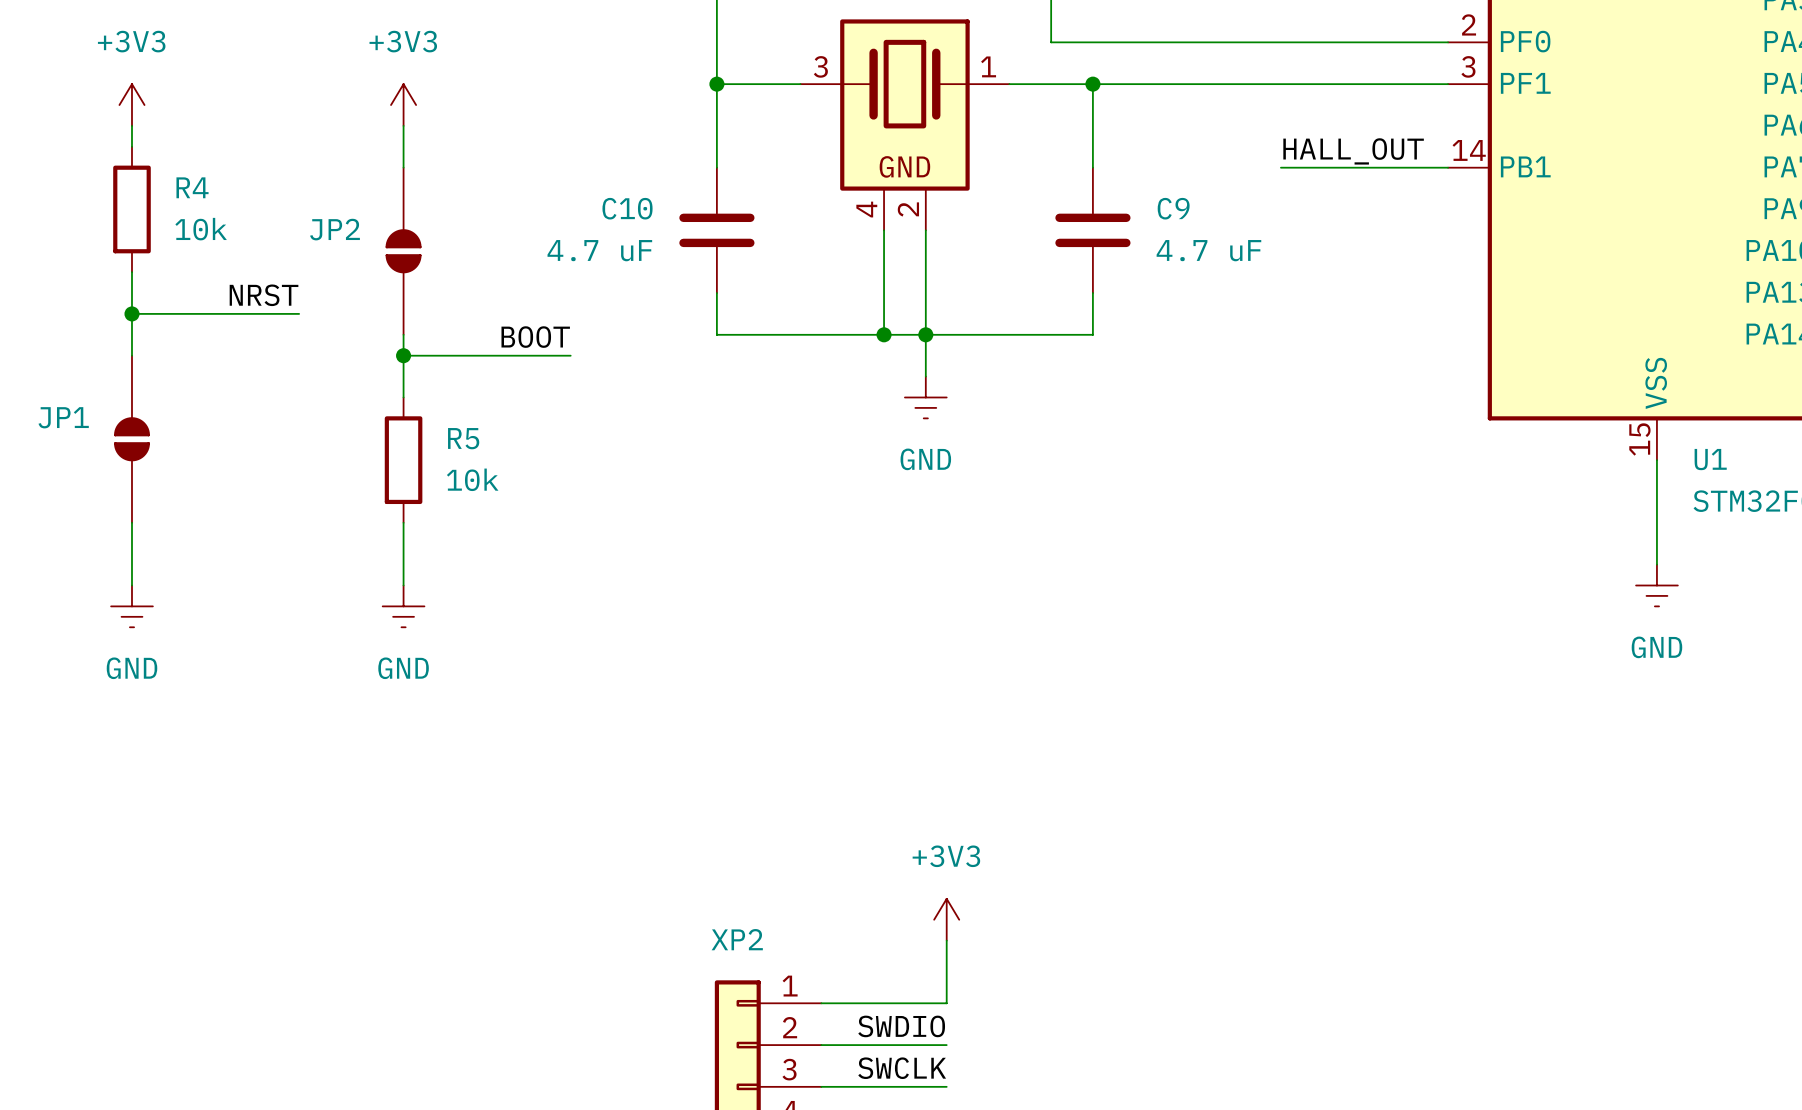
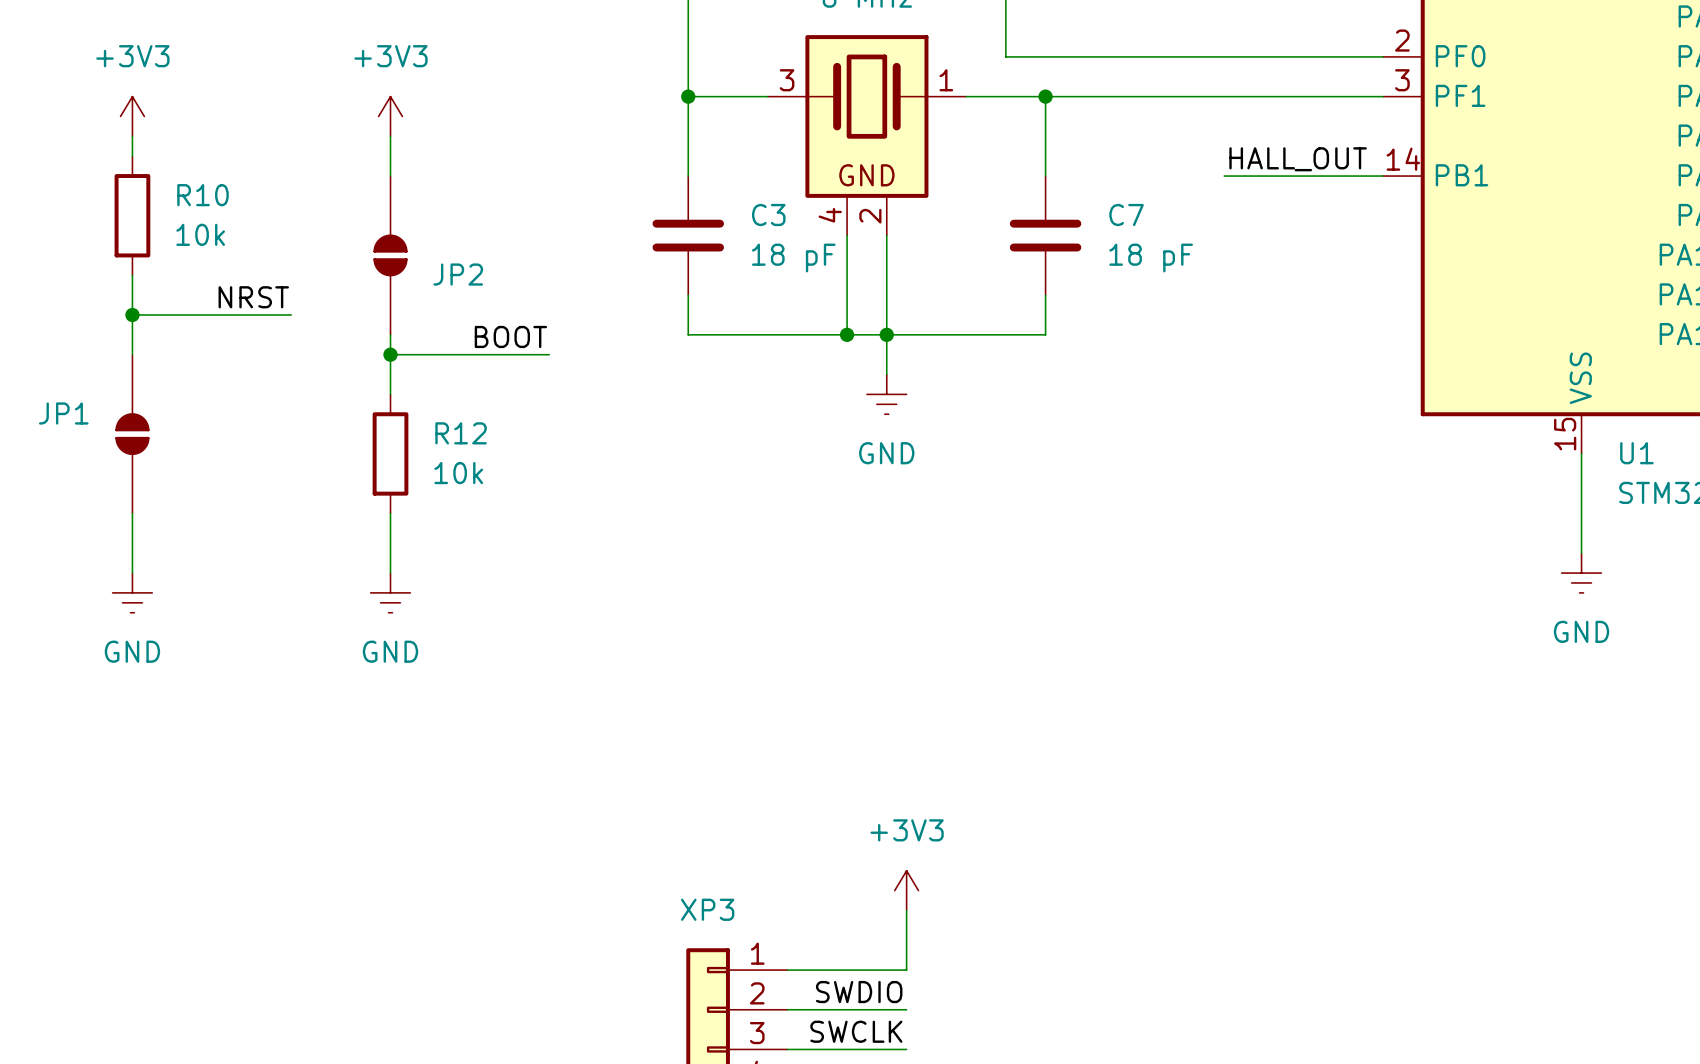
R4 name: R4 (192, 187) -> R10 (203, 195)
C10 name: C10 (627, 208) -> C3 (768, 214)
C9 name: C9 (1173, 208) -> C7 (1126, 214)
JP2 name position: JP2 (335, 229) -> JP2 (458, 274)
C10 value: 4.7 uF (599, 250) -> 18 pF (793, 258)
C9 value: 4.7 uF (1208, 250) -> 18 pF (1151, 258)
R5 name: R5 (463, 438) -> R12 (461, 433)
XP2 name: XP2 (737, 939) -> XP3 (707, 909)

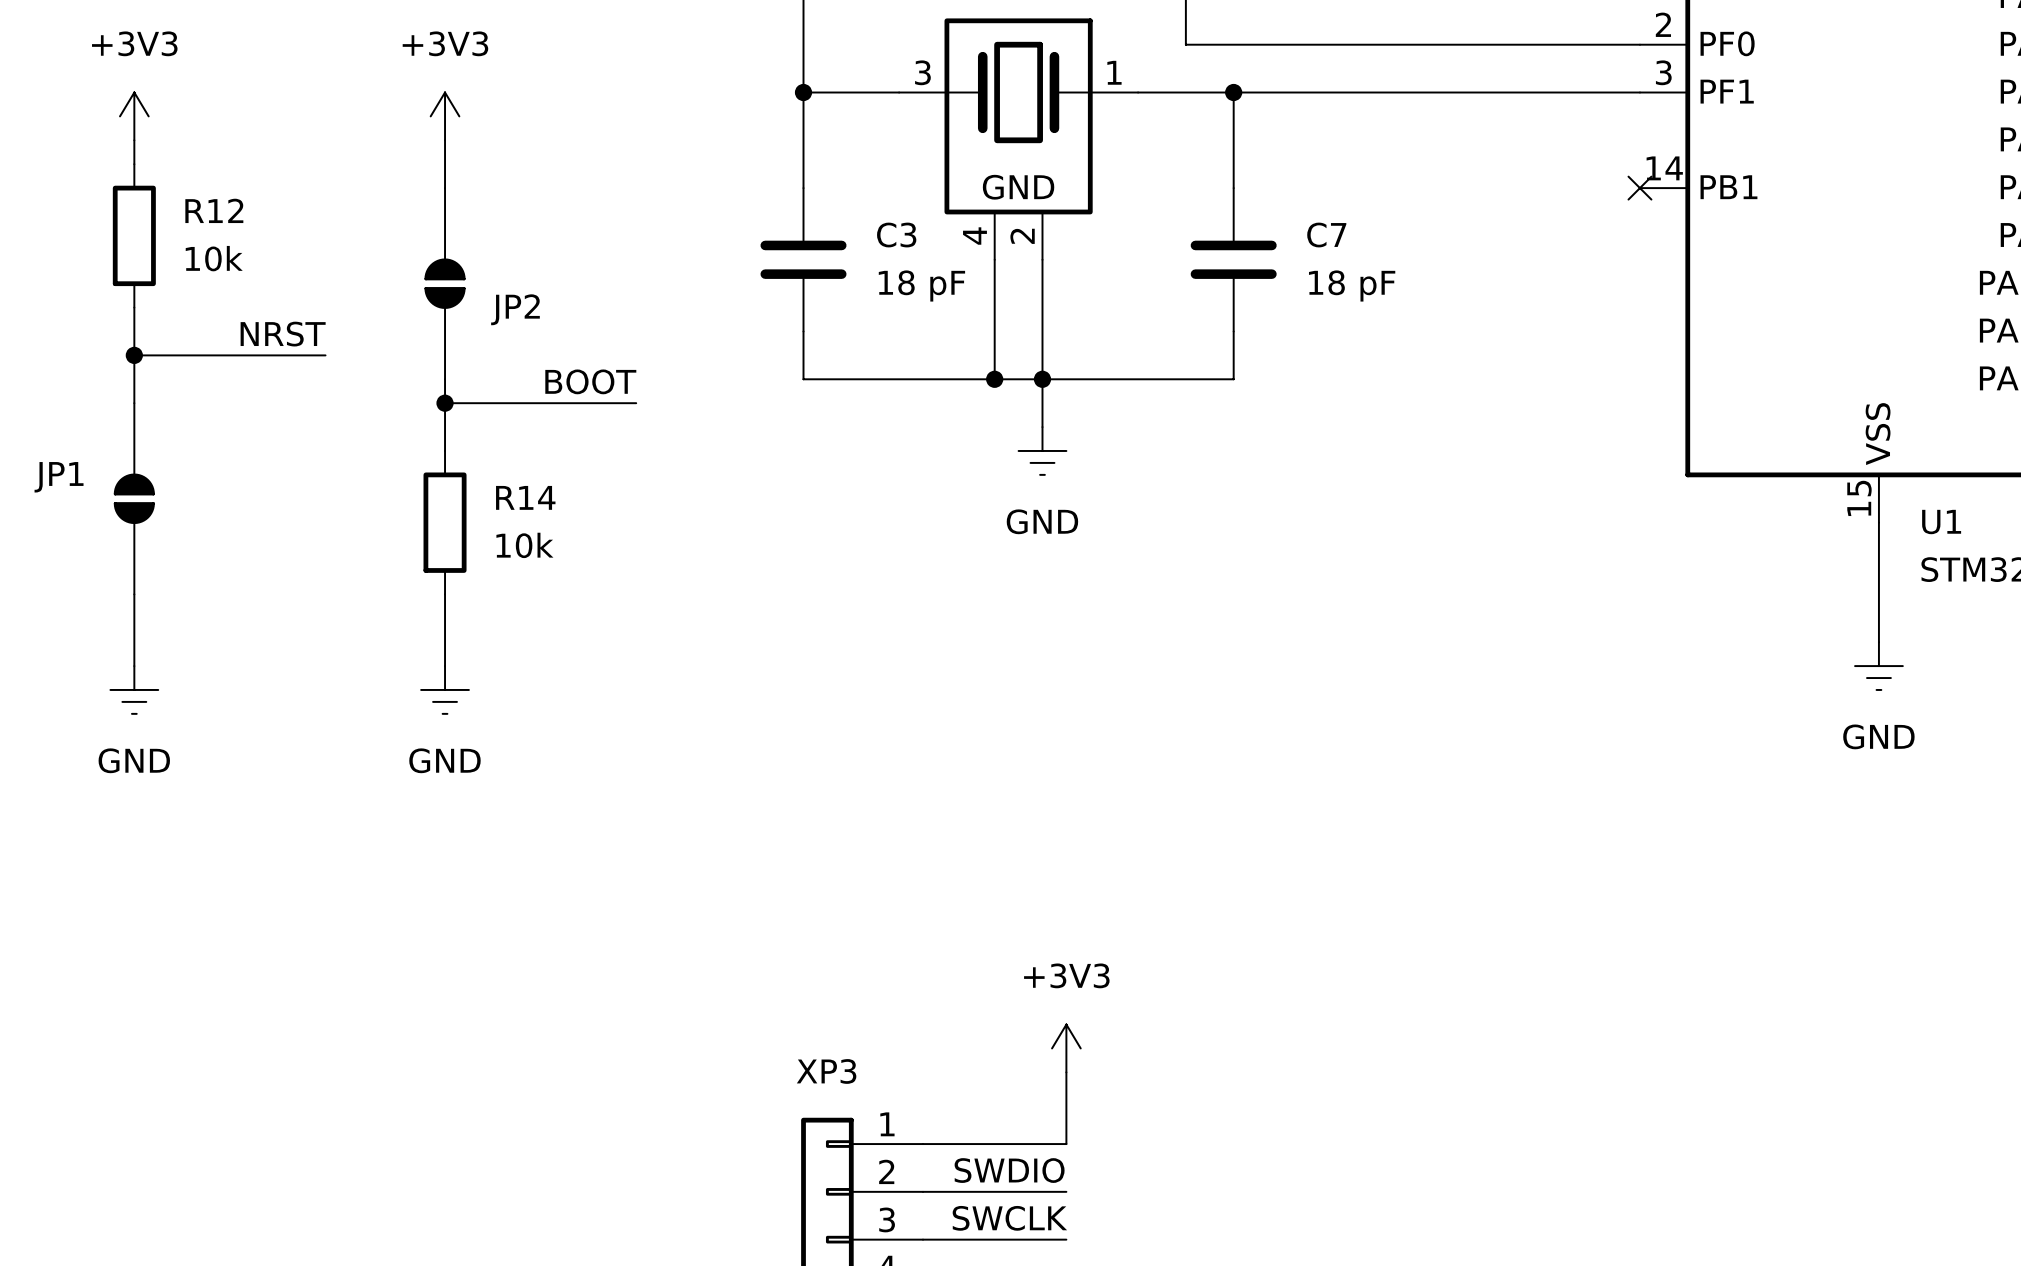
label: HALL_OUT (1298, 159) -> none
wire: (1224, 176) (1383, 176) -> none
no-connect mark: none -> (1639, 188)
R10 name: R10 (203, 195) -> R12 (214, 210)
R12 name: R12 (461, 433) -> R14 (525, 497)

